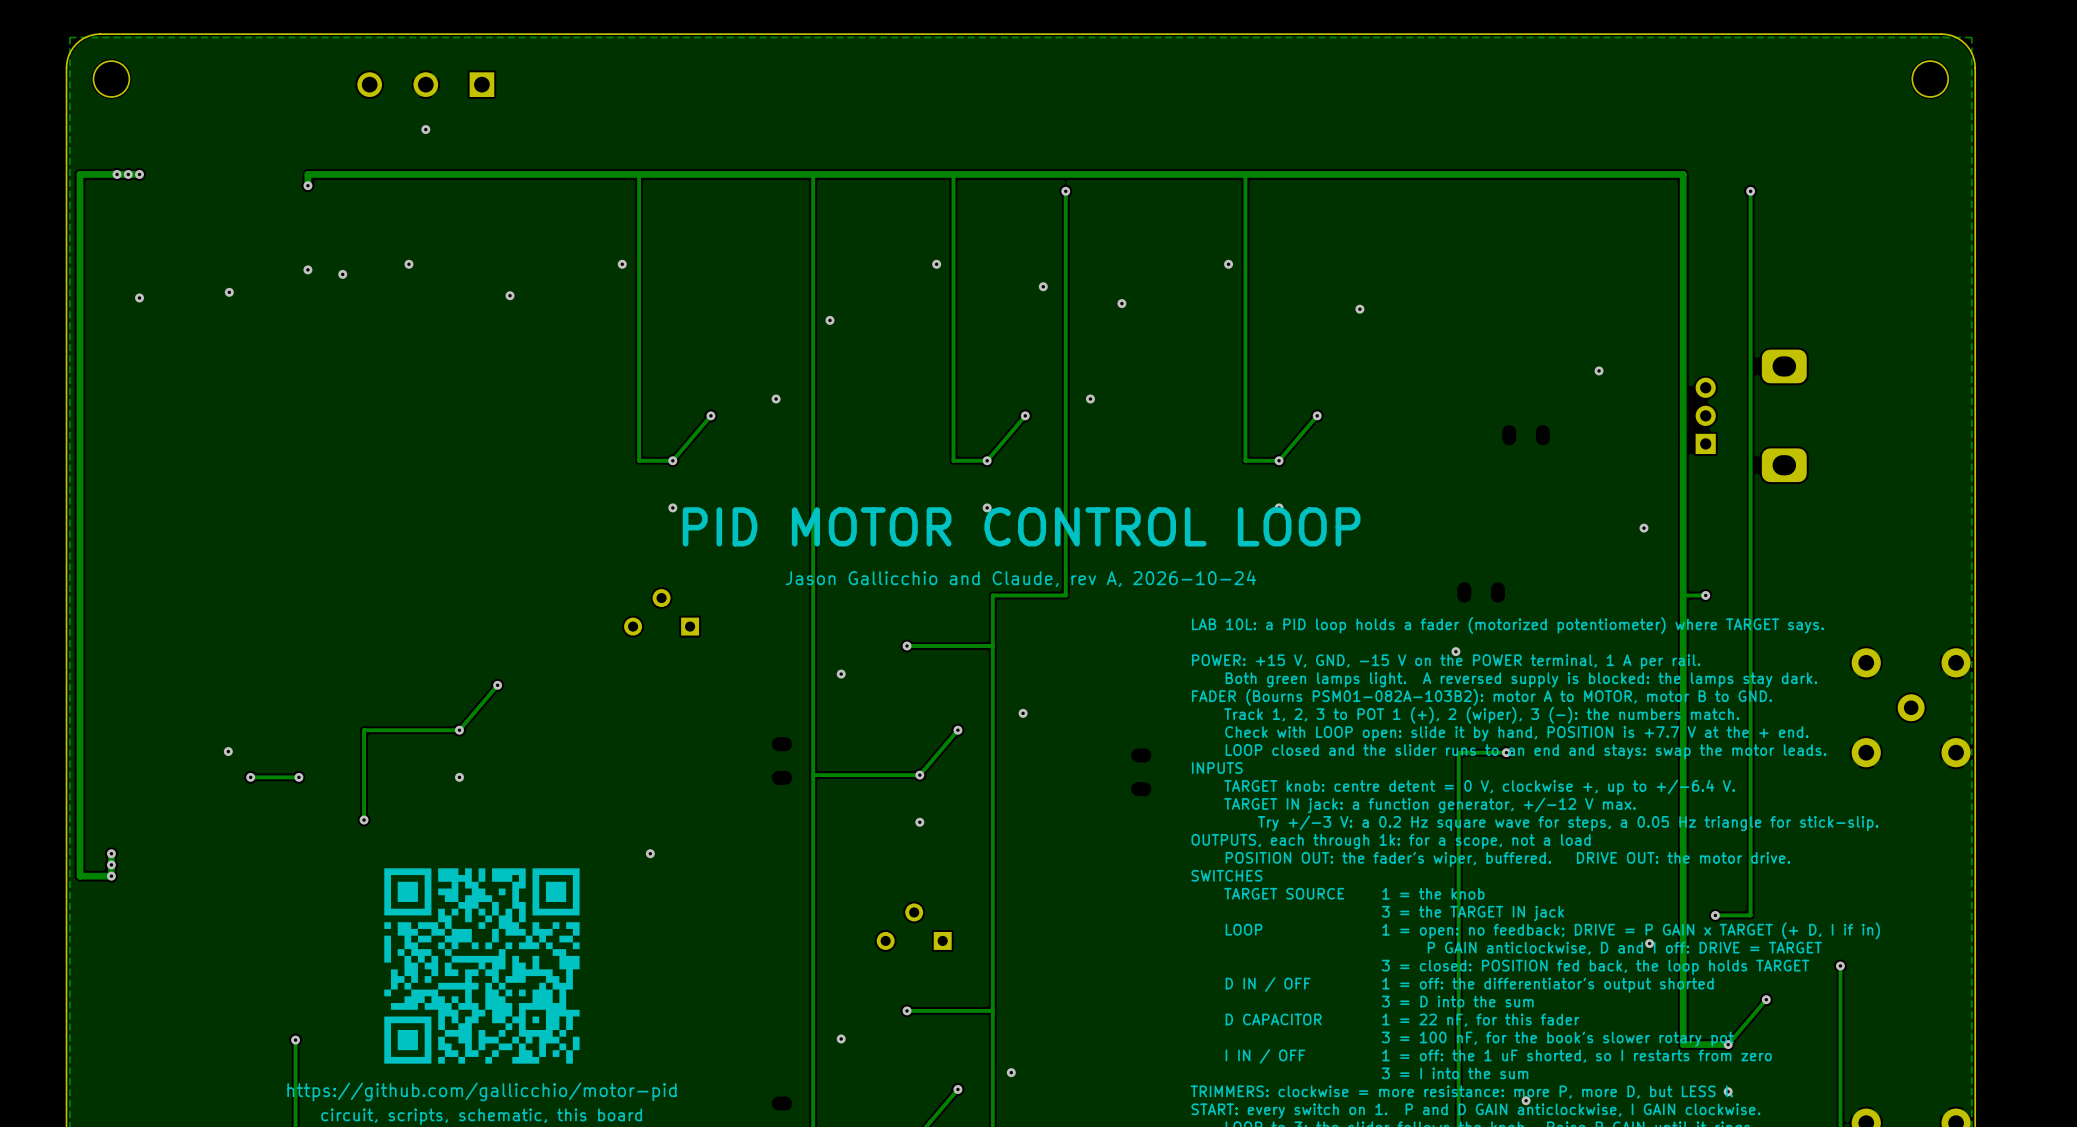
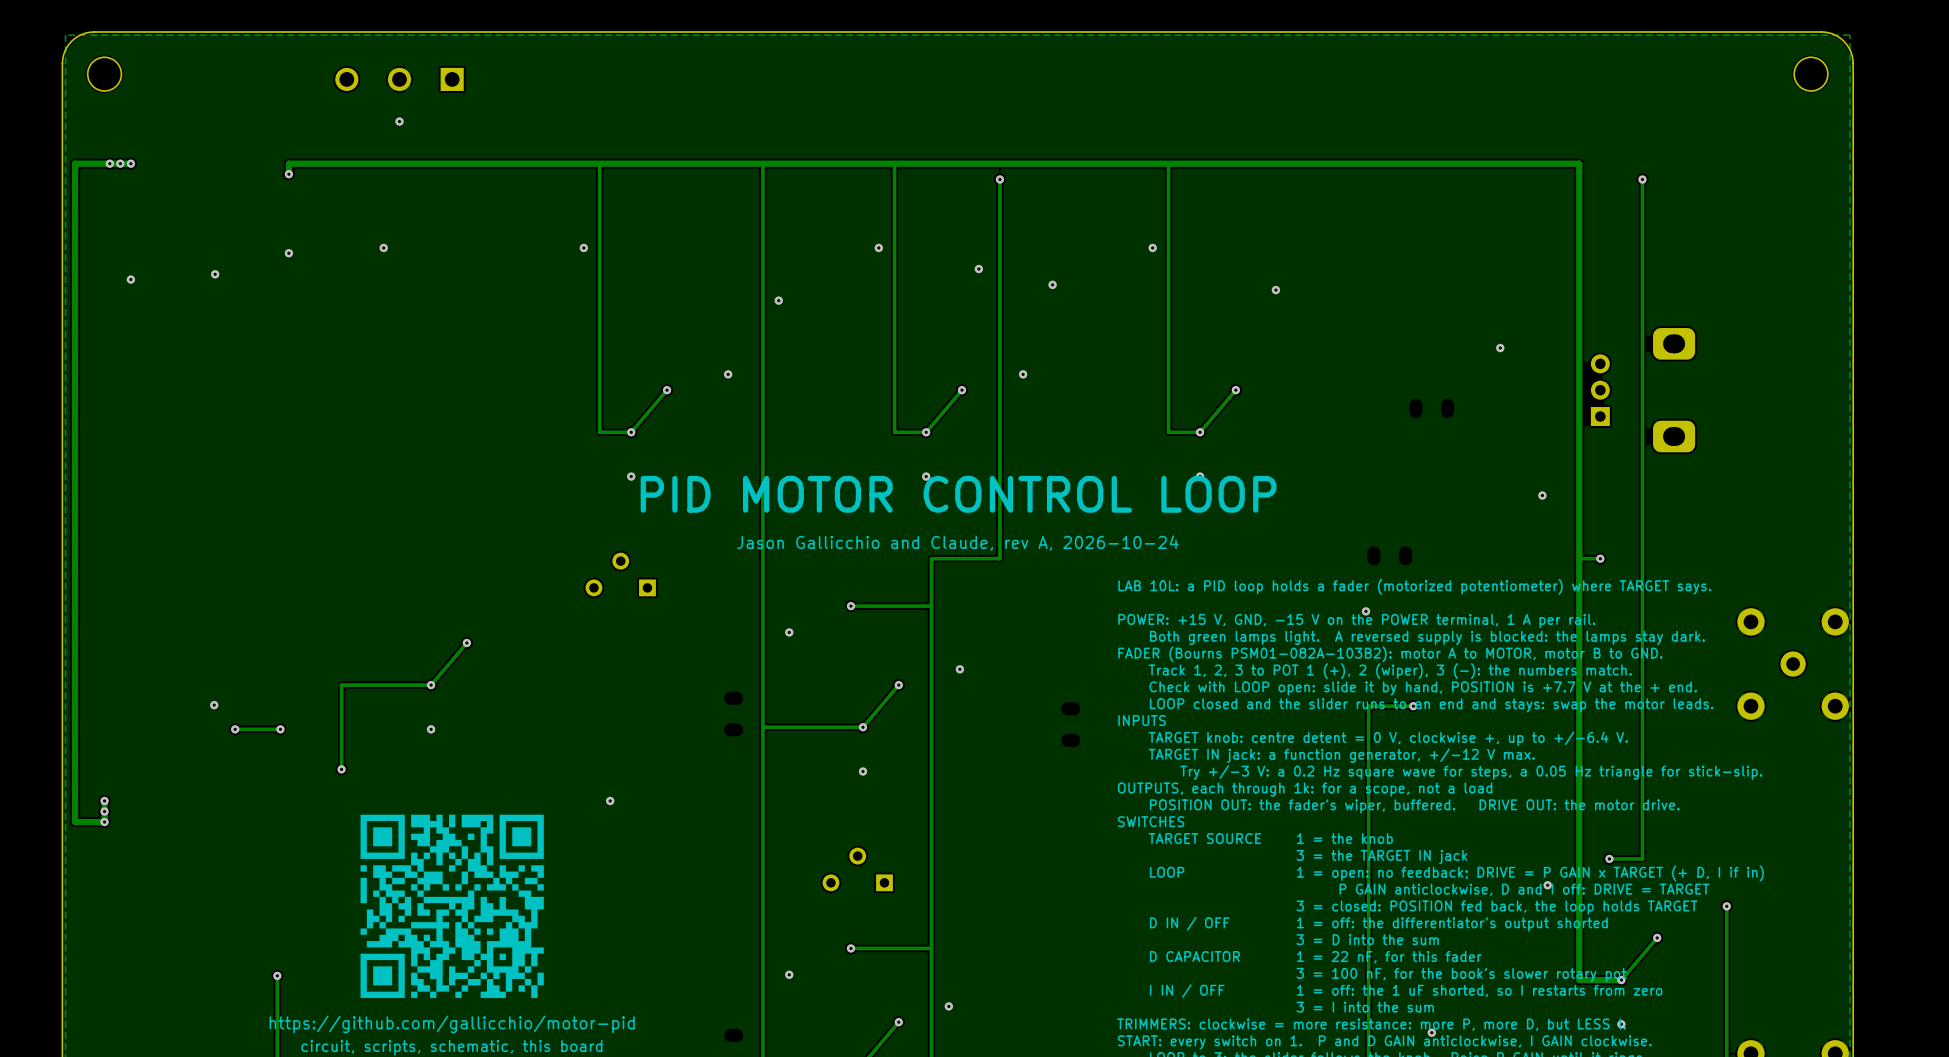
via: (342, 274) -> none
via: (510, 295) -> none

